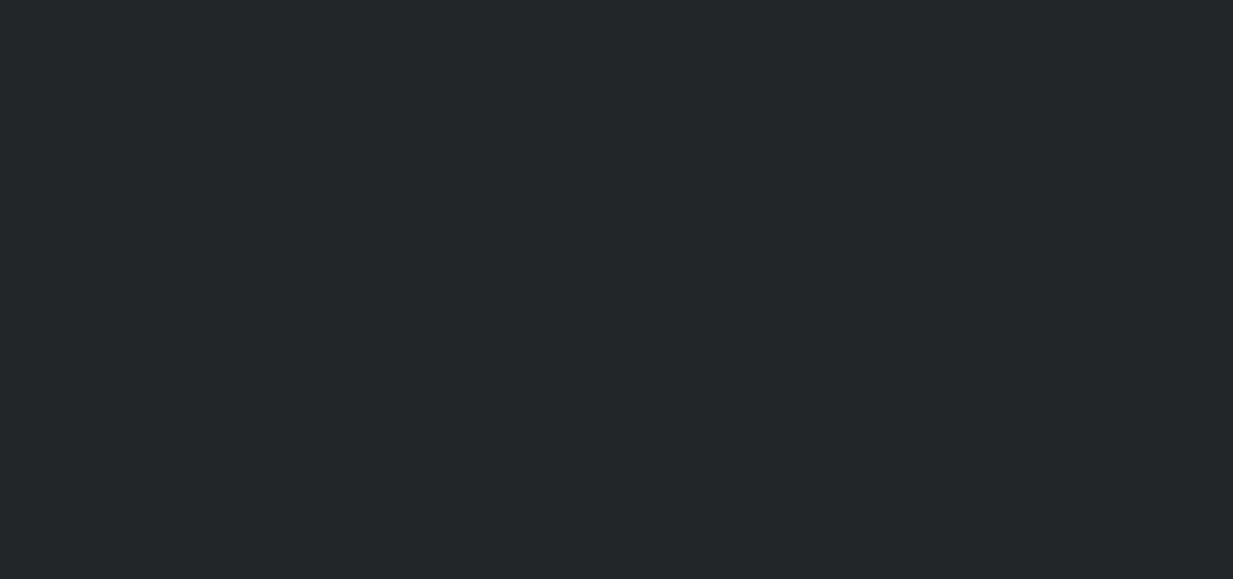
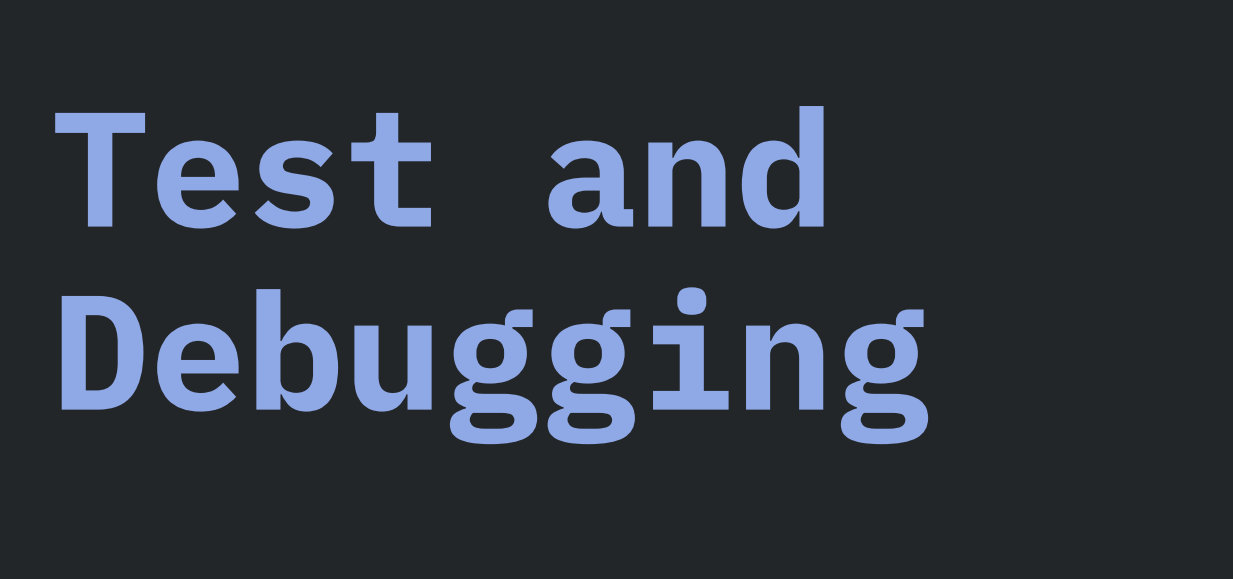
text: none -> Test and (439, 167)
text: none -> Debugging (494, 365)

